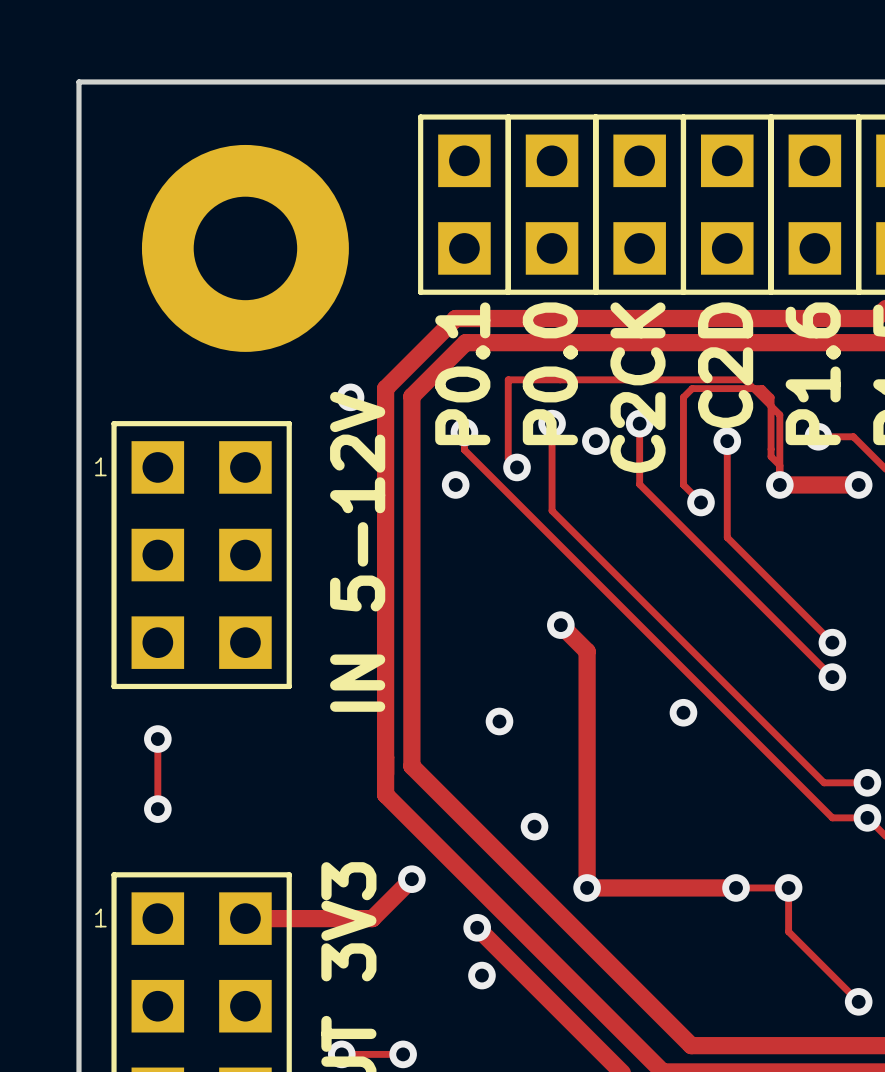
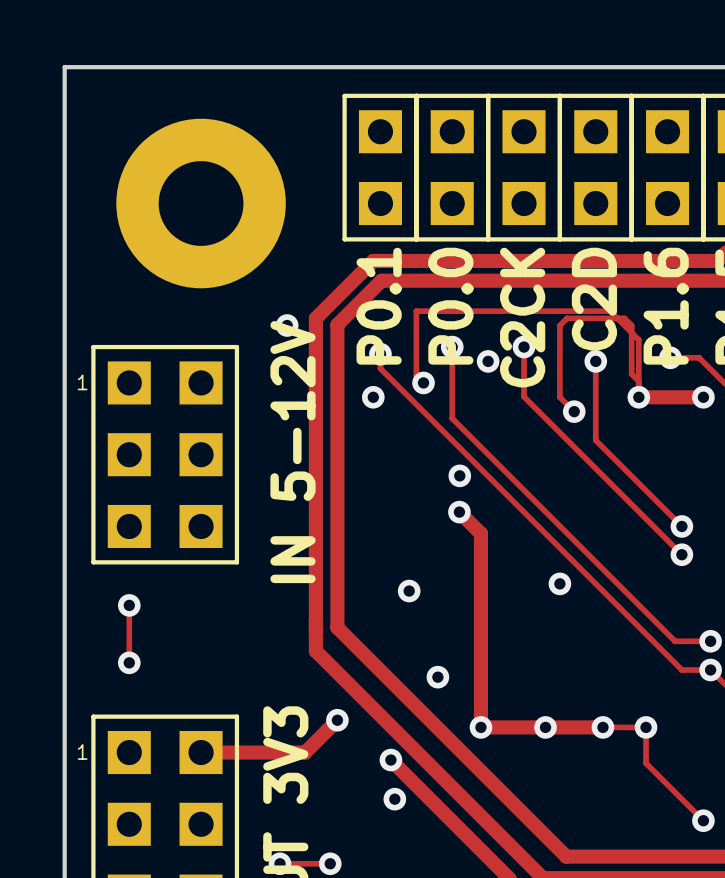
via: none -> (459, 475)
via: none -> (545, 727)

